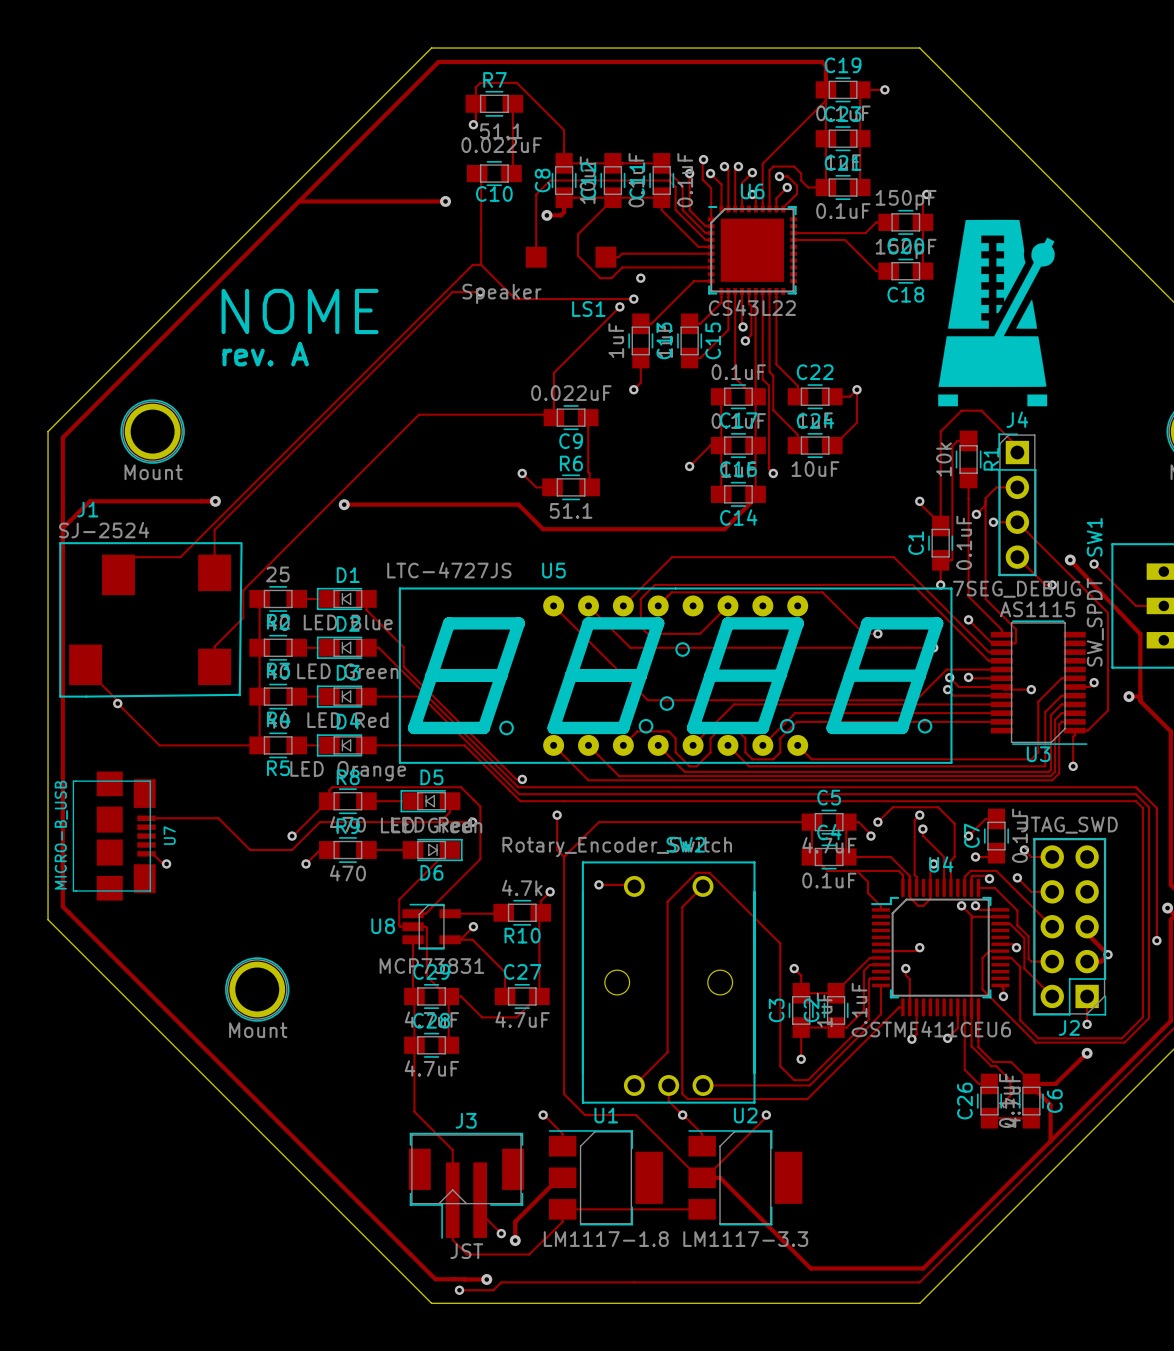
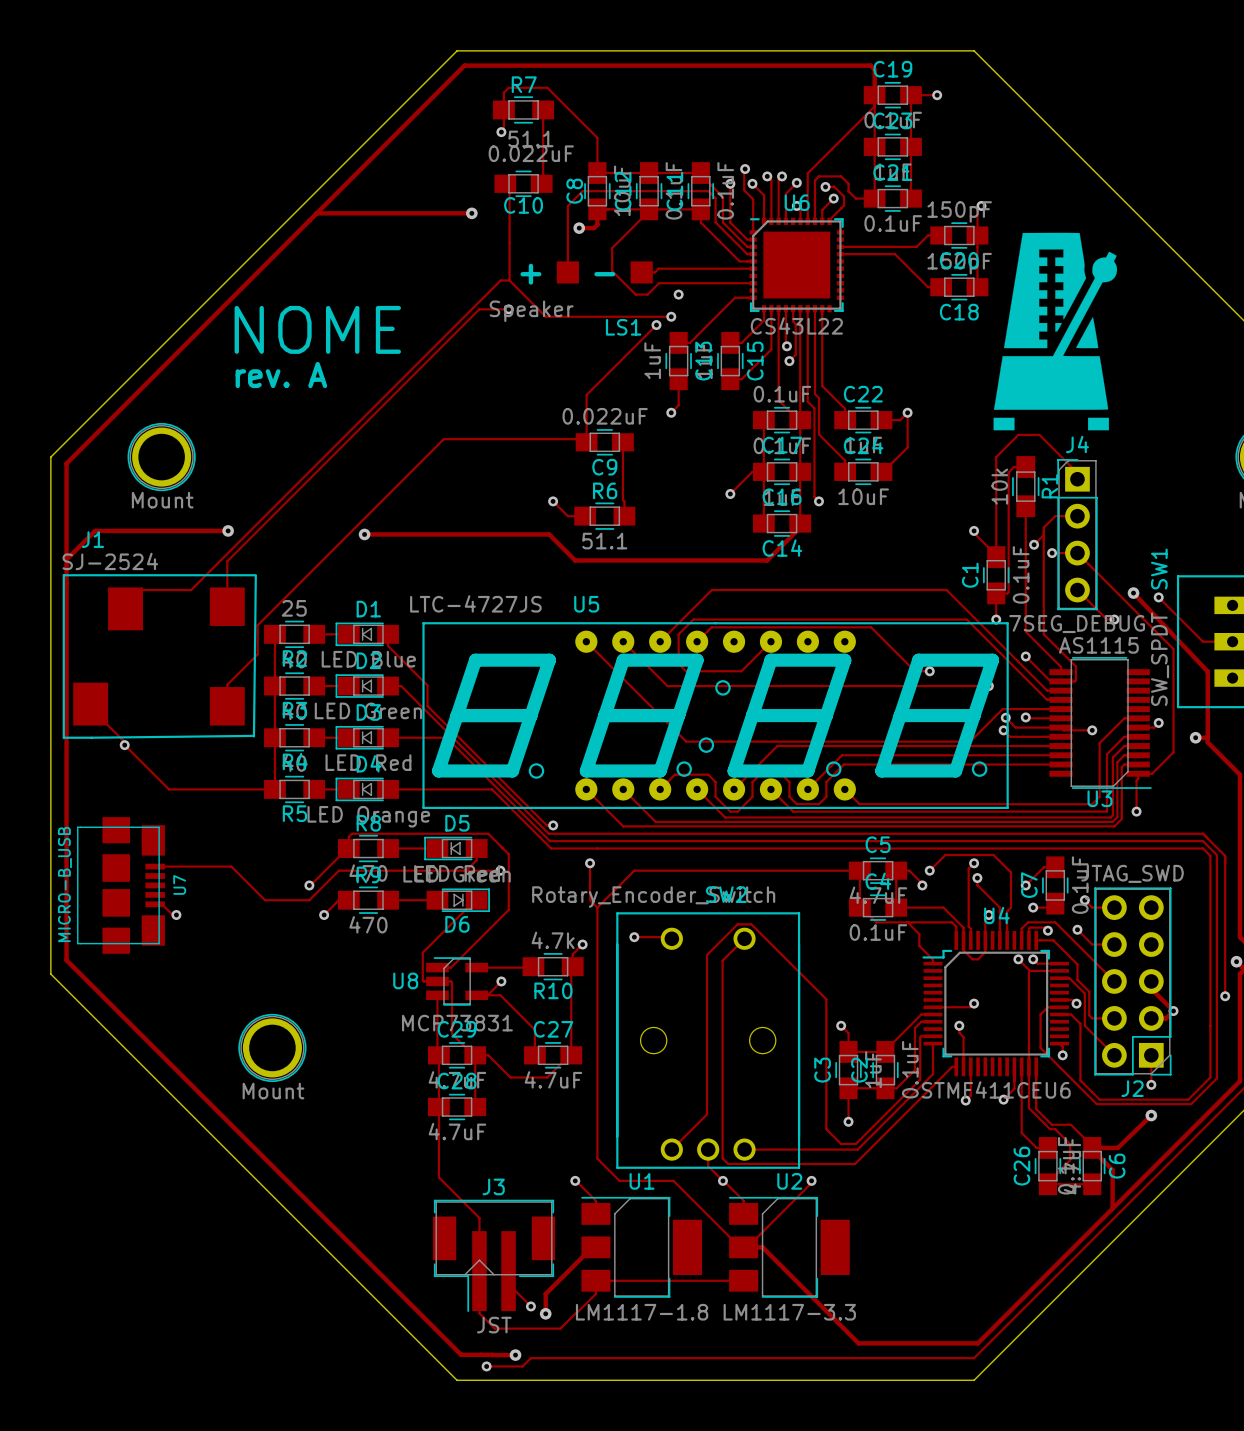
text: none -> + (530, 274)
text: none -> - (604, 274)

